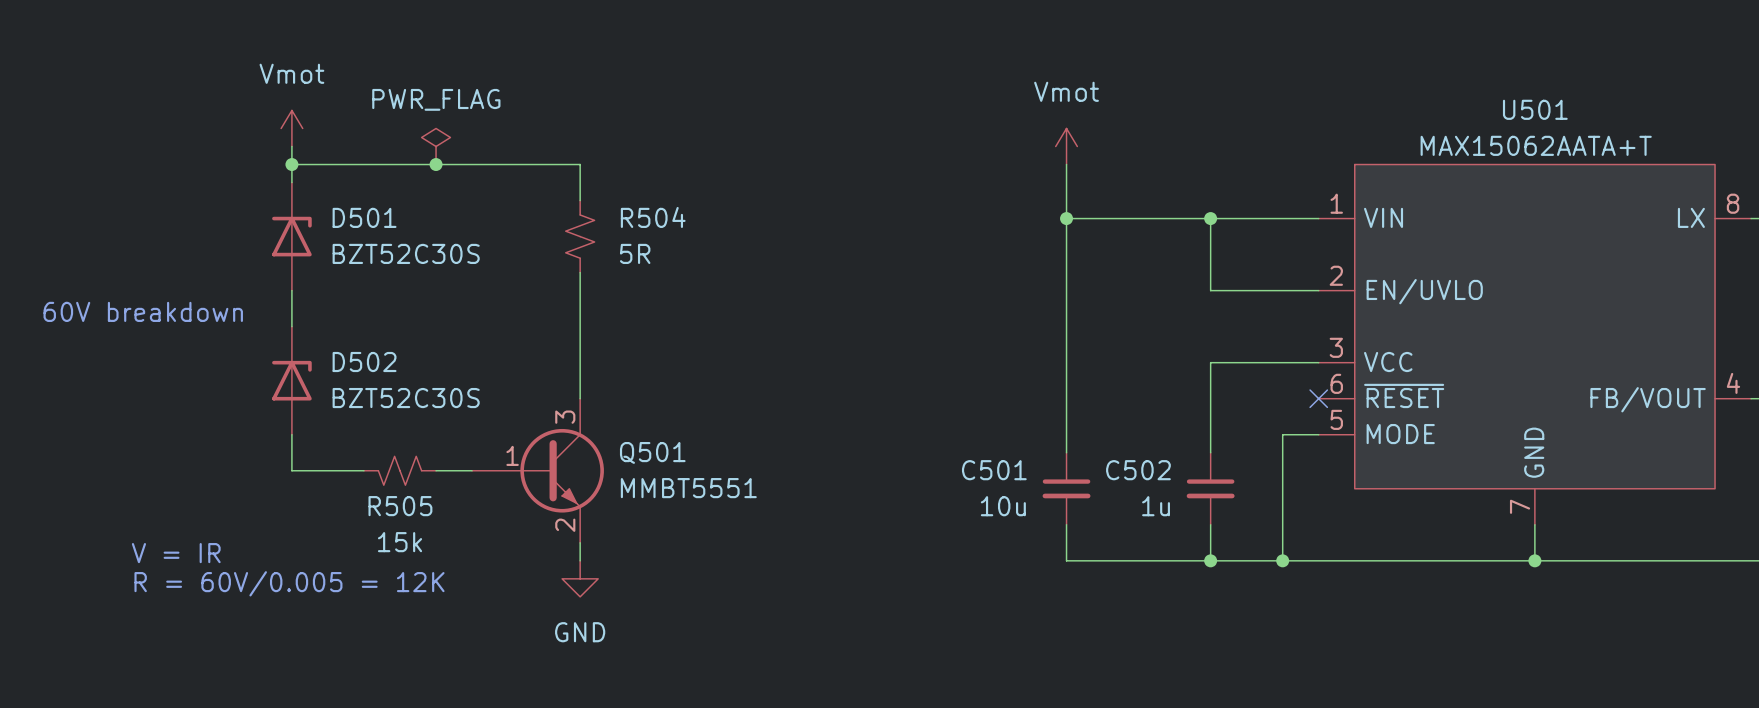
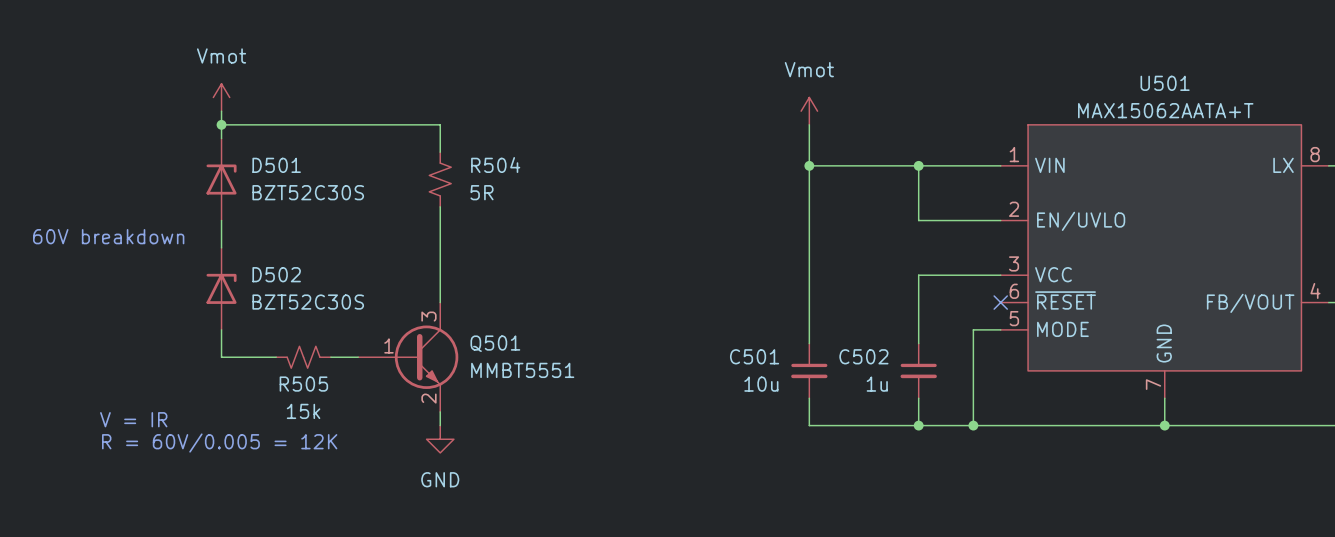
power symbol: PWR_FLAG (436, 146) -> none
junction: (436, 164) -> none

